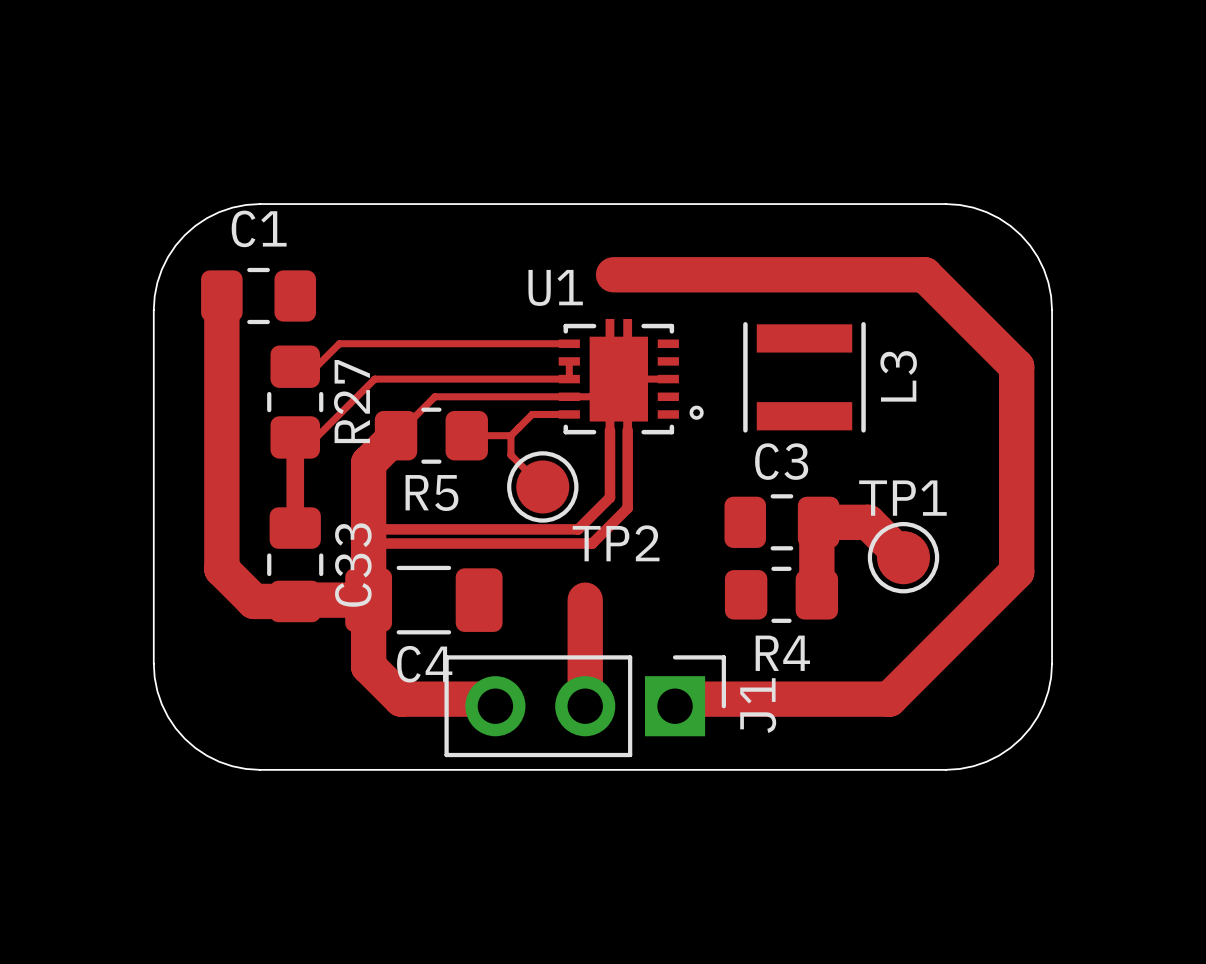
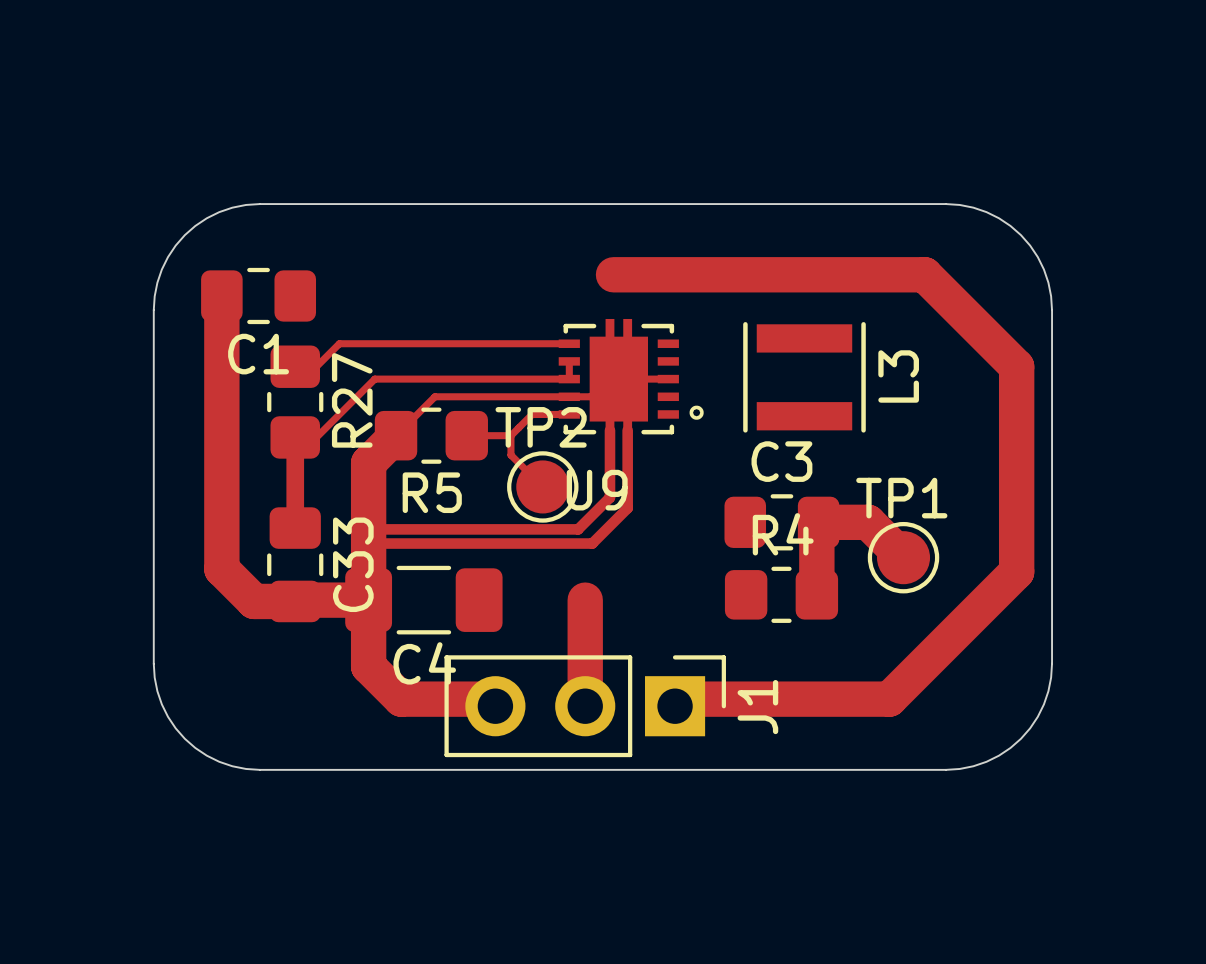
C1 name position: C1 (259, 228) -> C1 (258, 354)
U1 name: U1 (555, 287) -> U9 (597, 490)
TP2 name position: TP2 (616, 543) -> TP2 (541, 427)
R4 name position: R4 (782, 653) -> R4 (783, 534)

